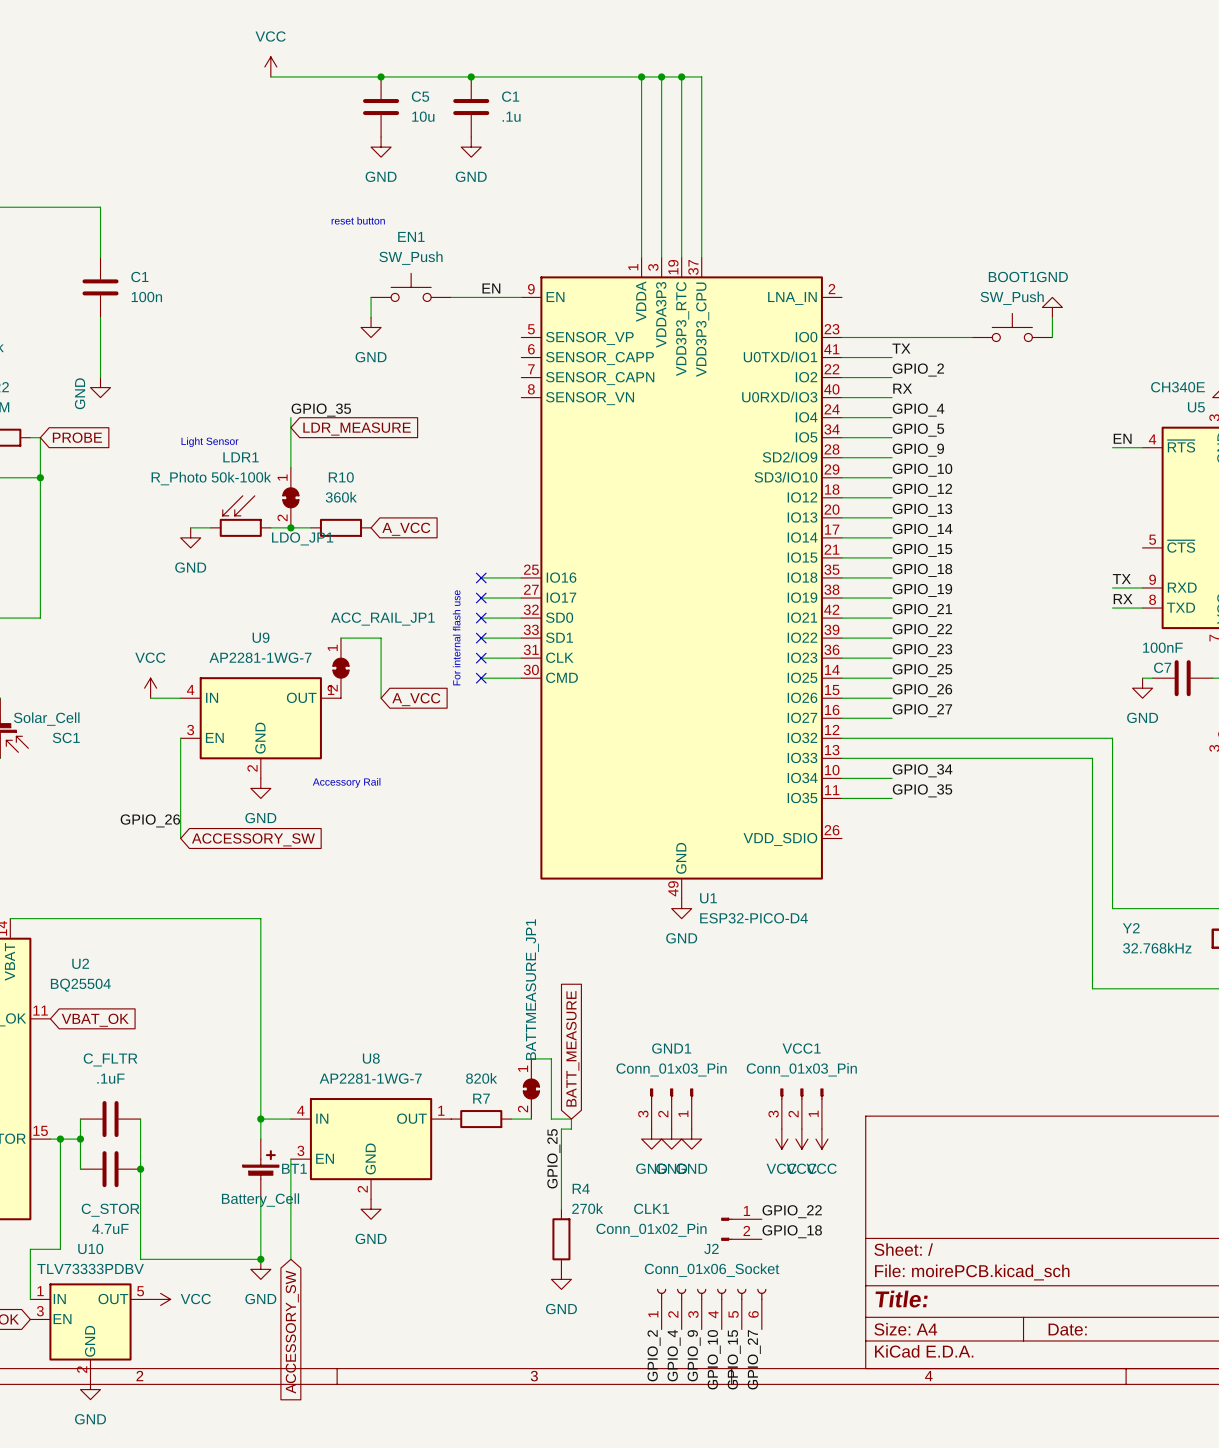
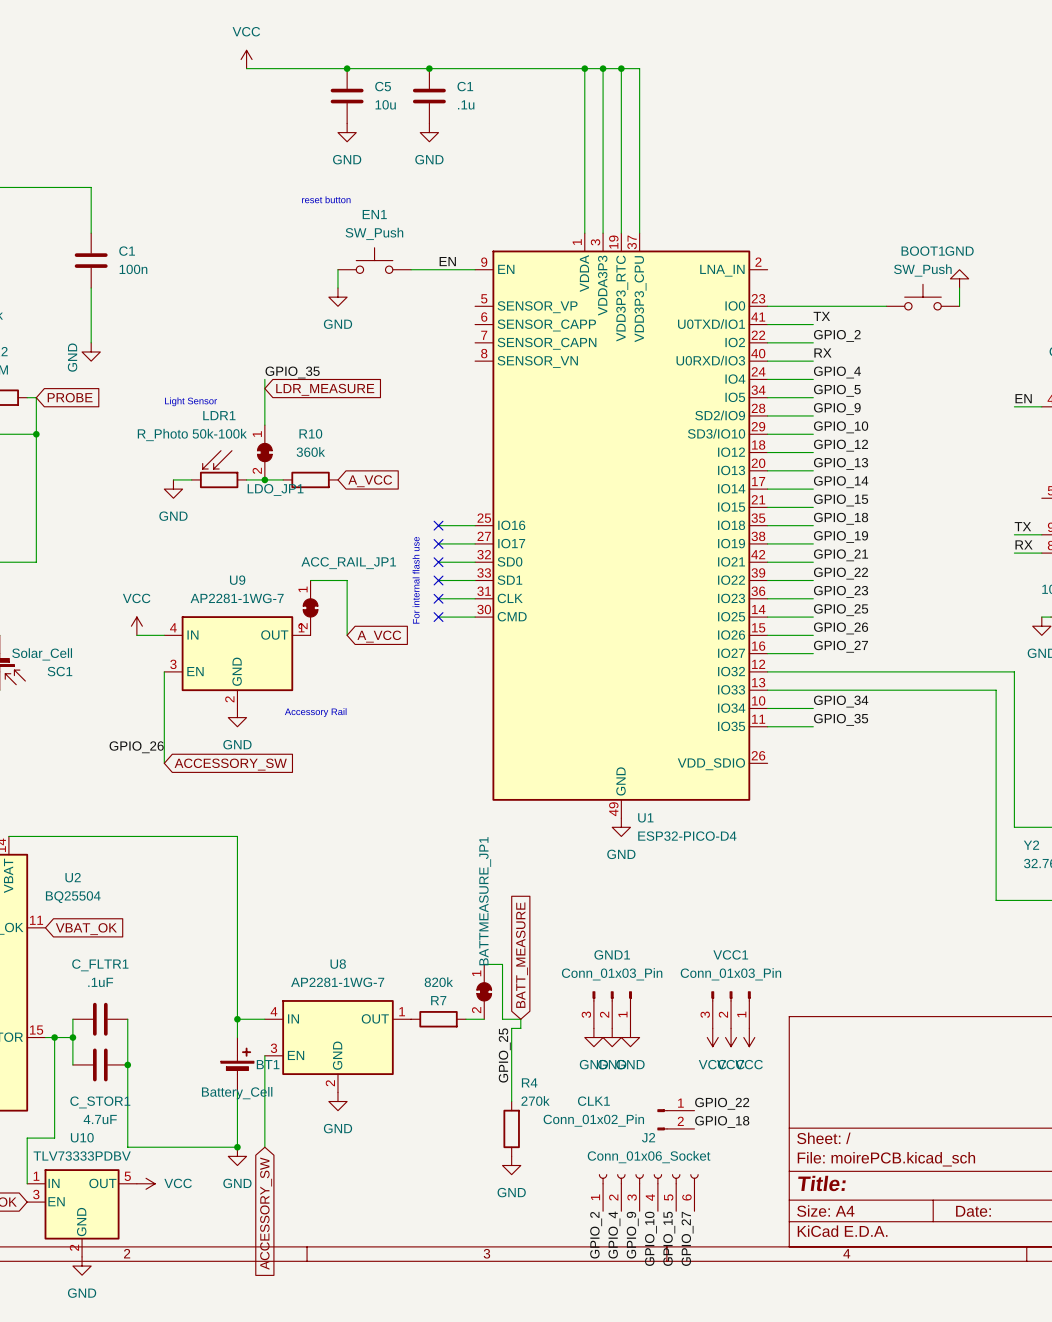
C_FLTR name: C_FLTR (110, 1059) -> C_FLTR1 (100, 965)
C_STOR name: C_STOR (110, 1210) -> C_STOR1 (100, 1102)

